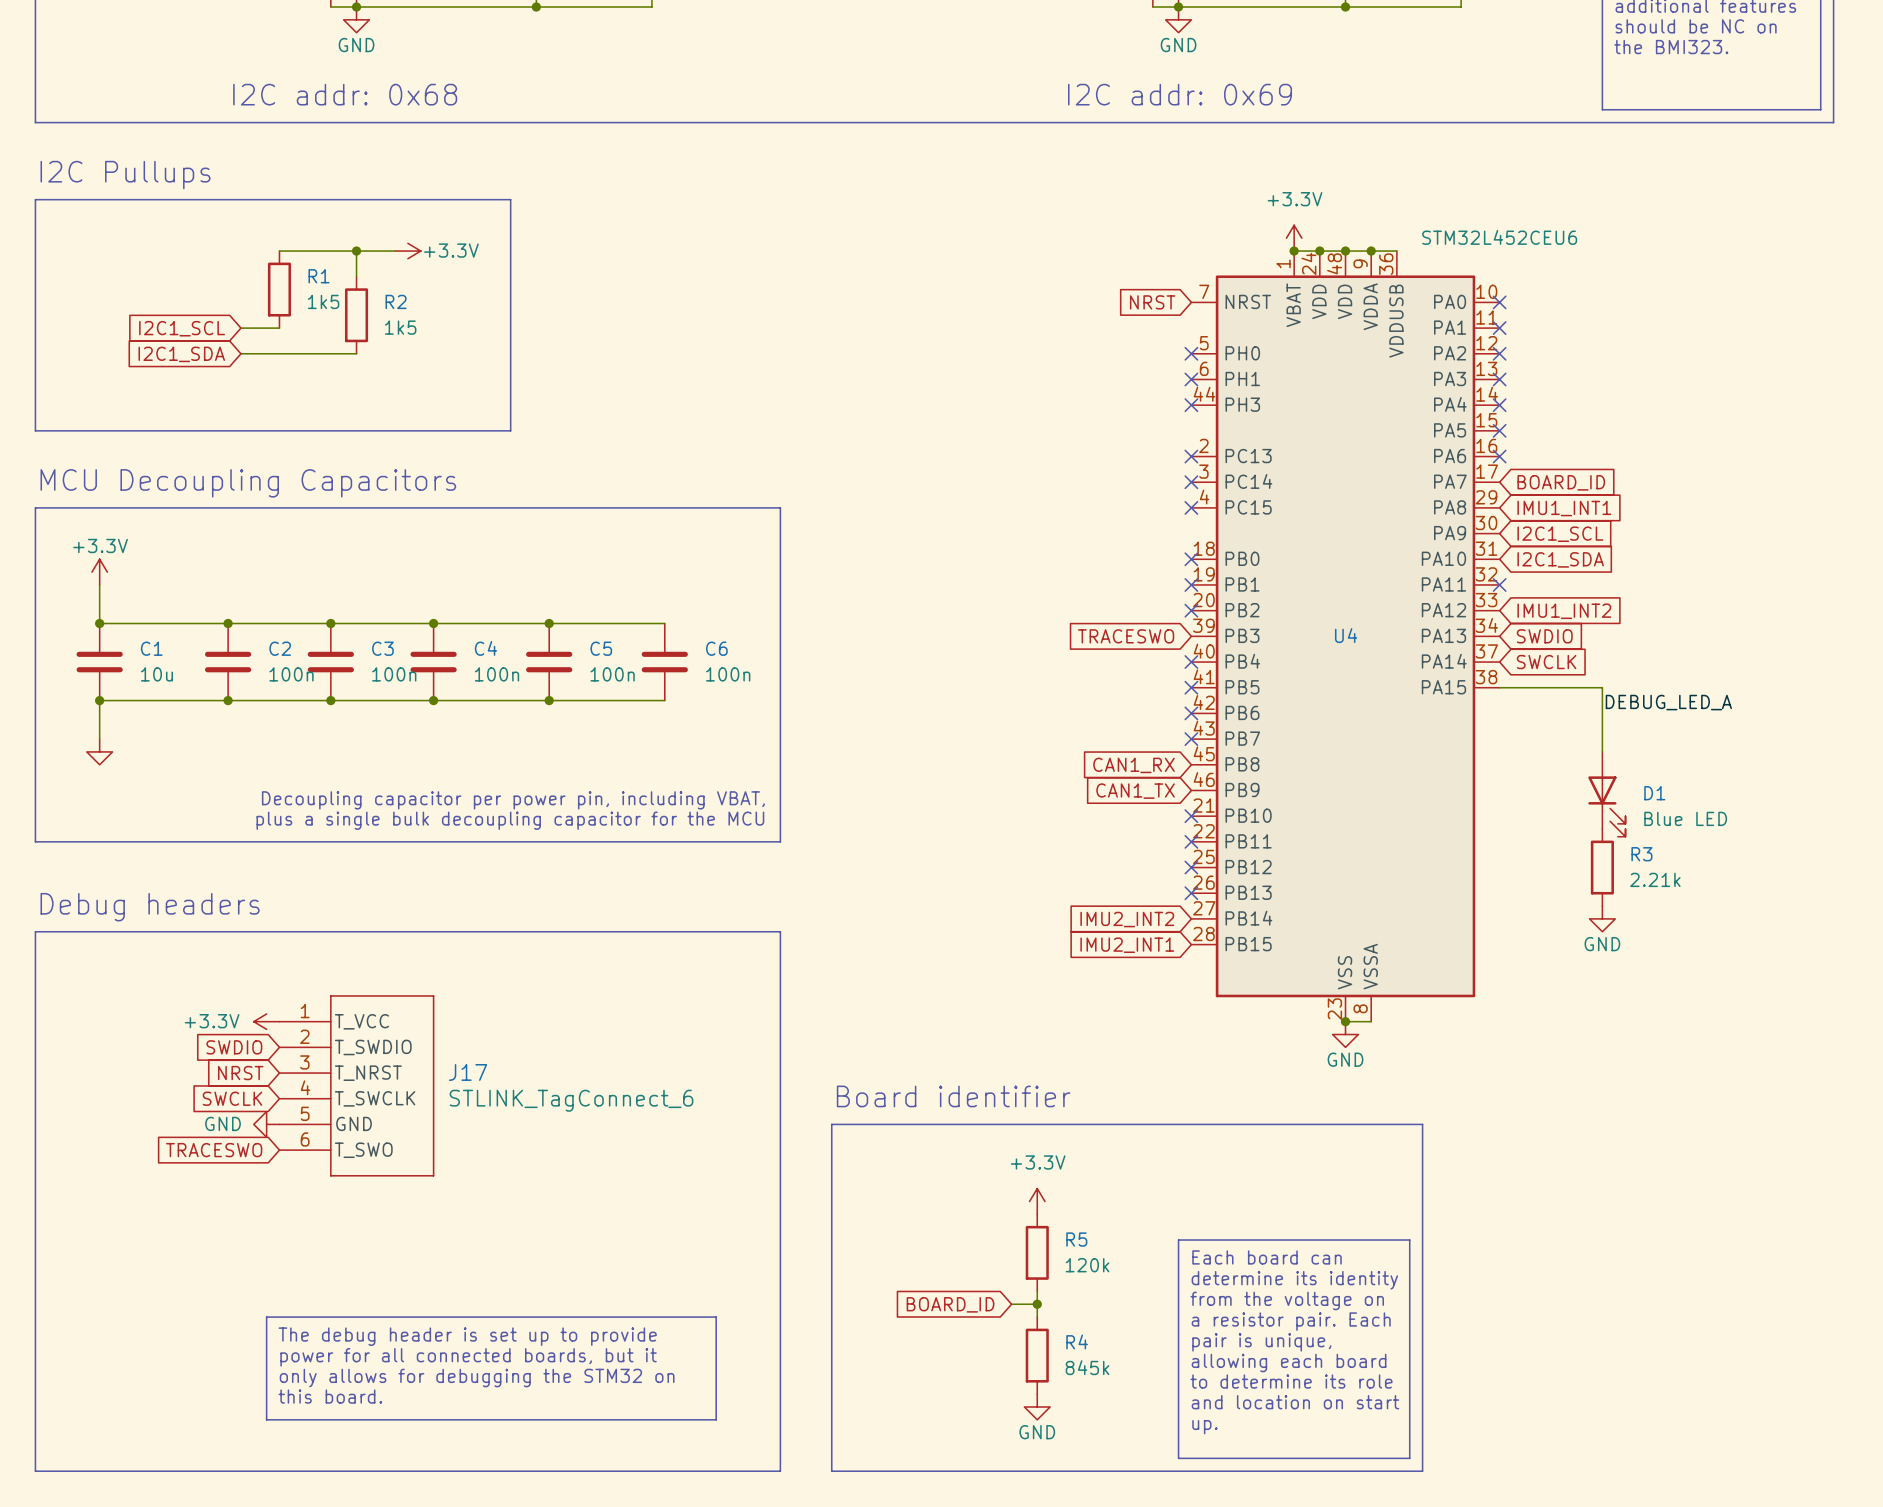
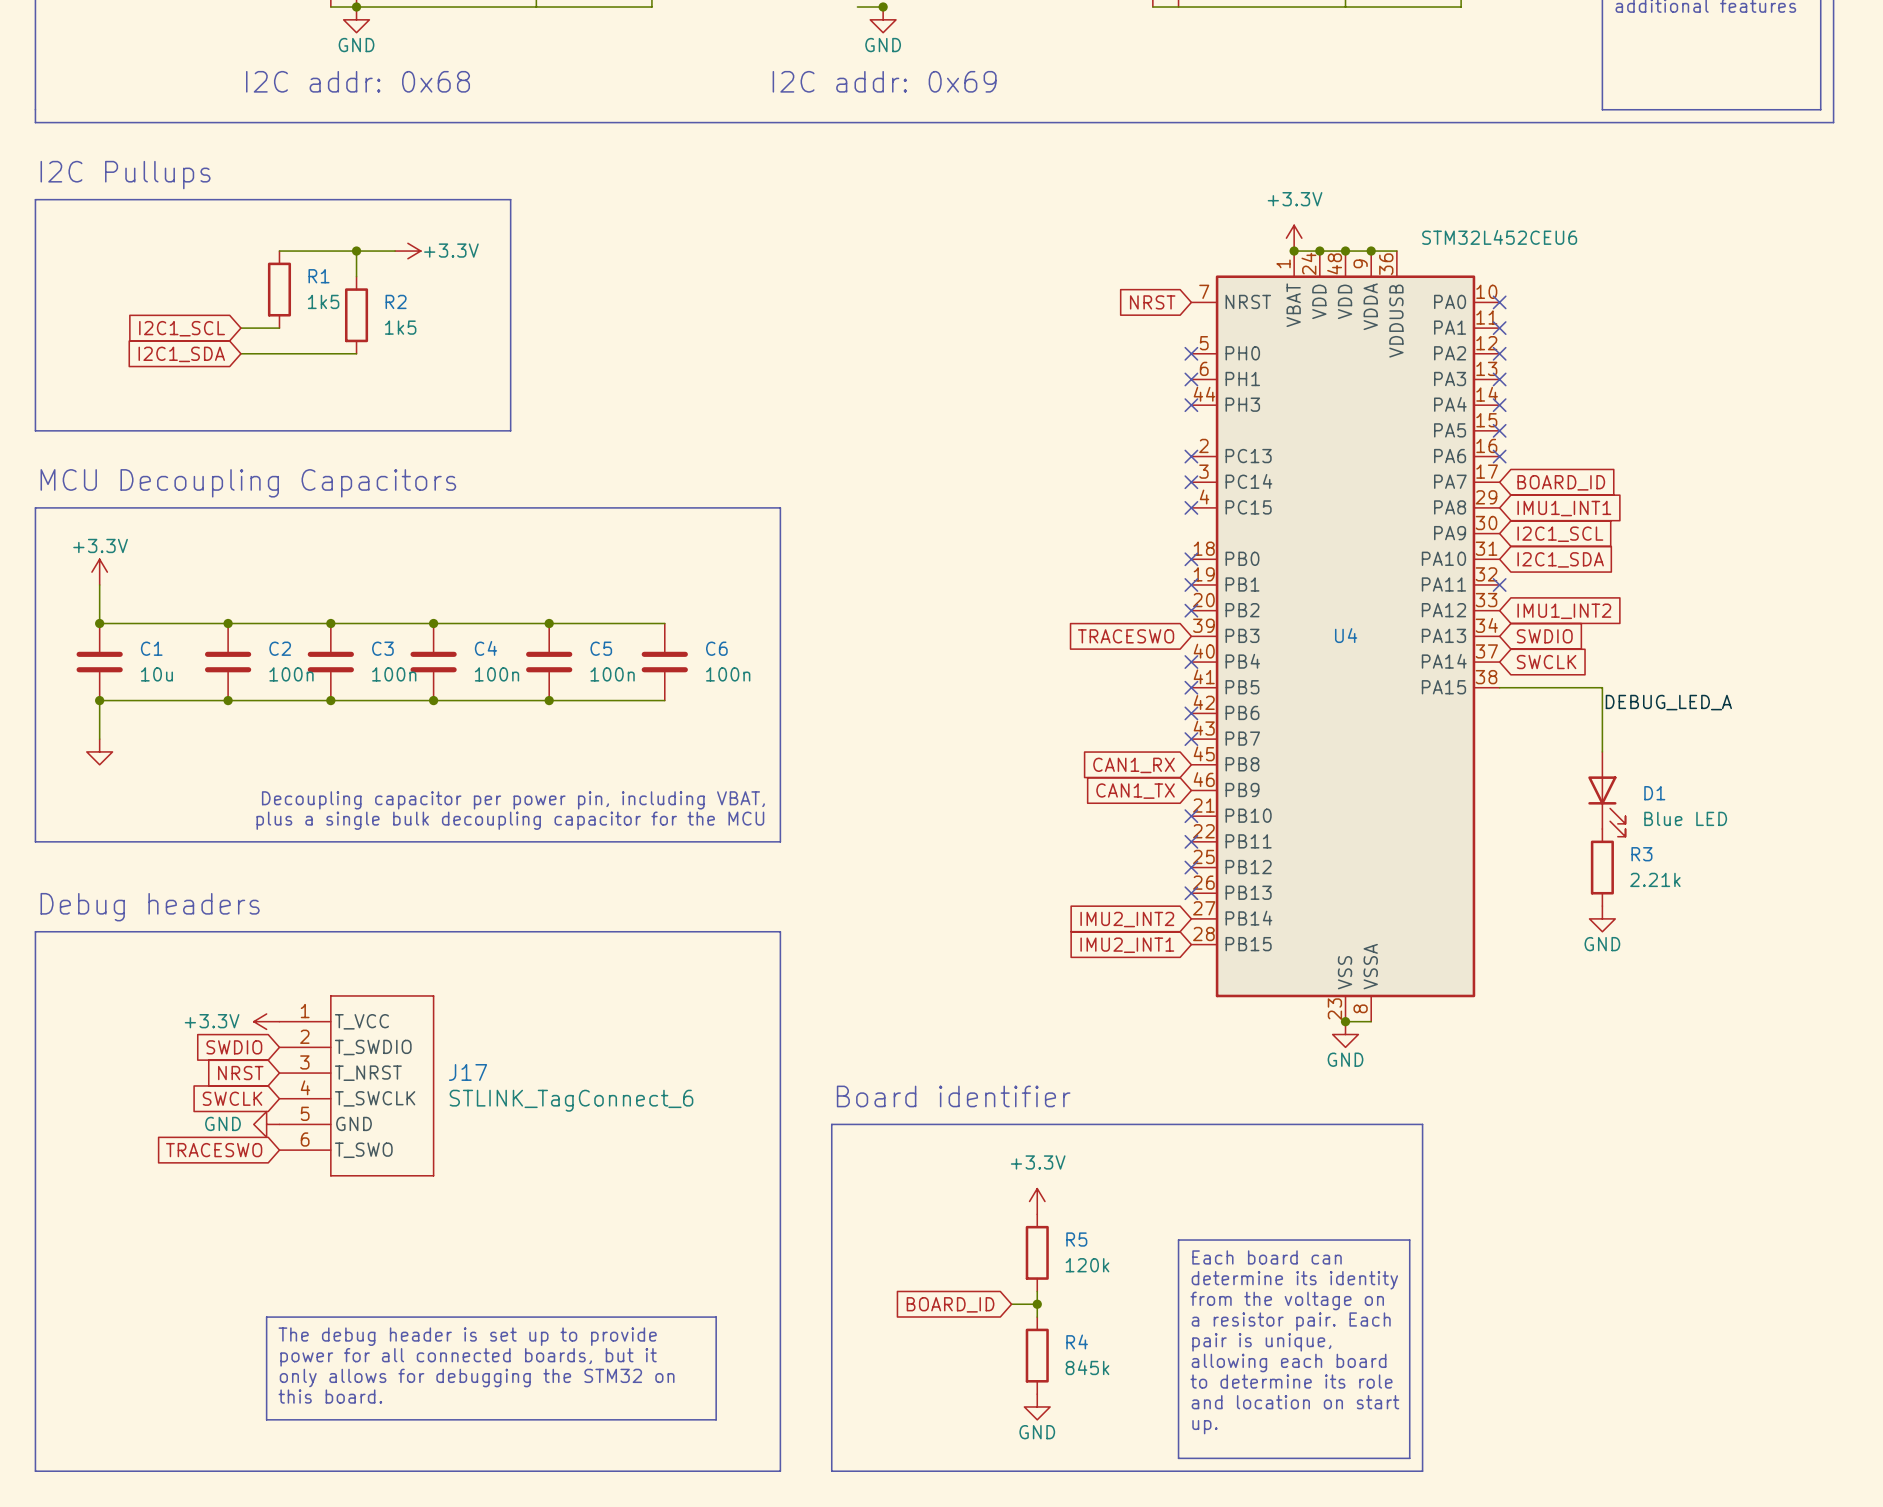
junction: (536, 7) -> none
wire: none -> (857, 7) (883, 7)
junction: none -> (883, 7)
junction: (1178, 7) -> none
junction: (1345, 7) -> none
power symbol: none -> GND (883, 19)
power symbol: GND (1178, 19) -> none
text: should be NC on (1696, 26) -> none
text: the BMI323. (1671, 47) -> none
text: none -> I2C addr: 0x69 (884, 81)
text position: I2C addr: 0x68 (345, 94) -> I2C addr: 0x68 (358, 81)
text: I2C addr: 0x69 (1180, 94) -> none

